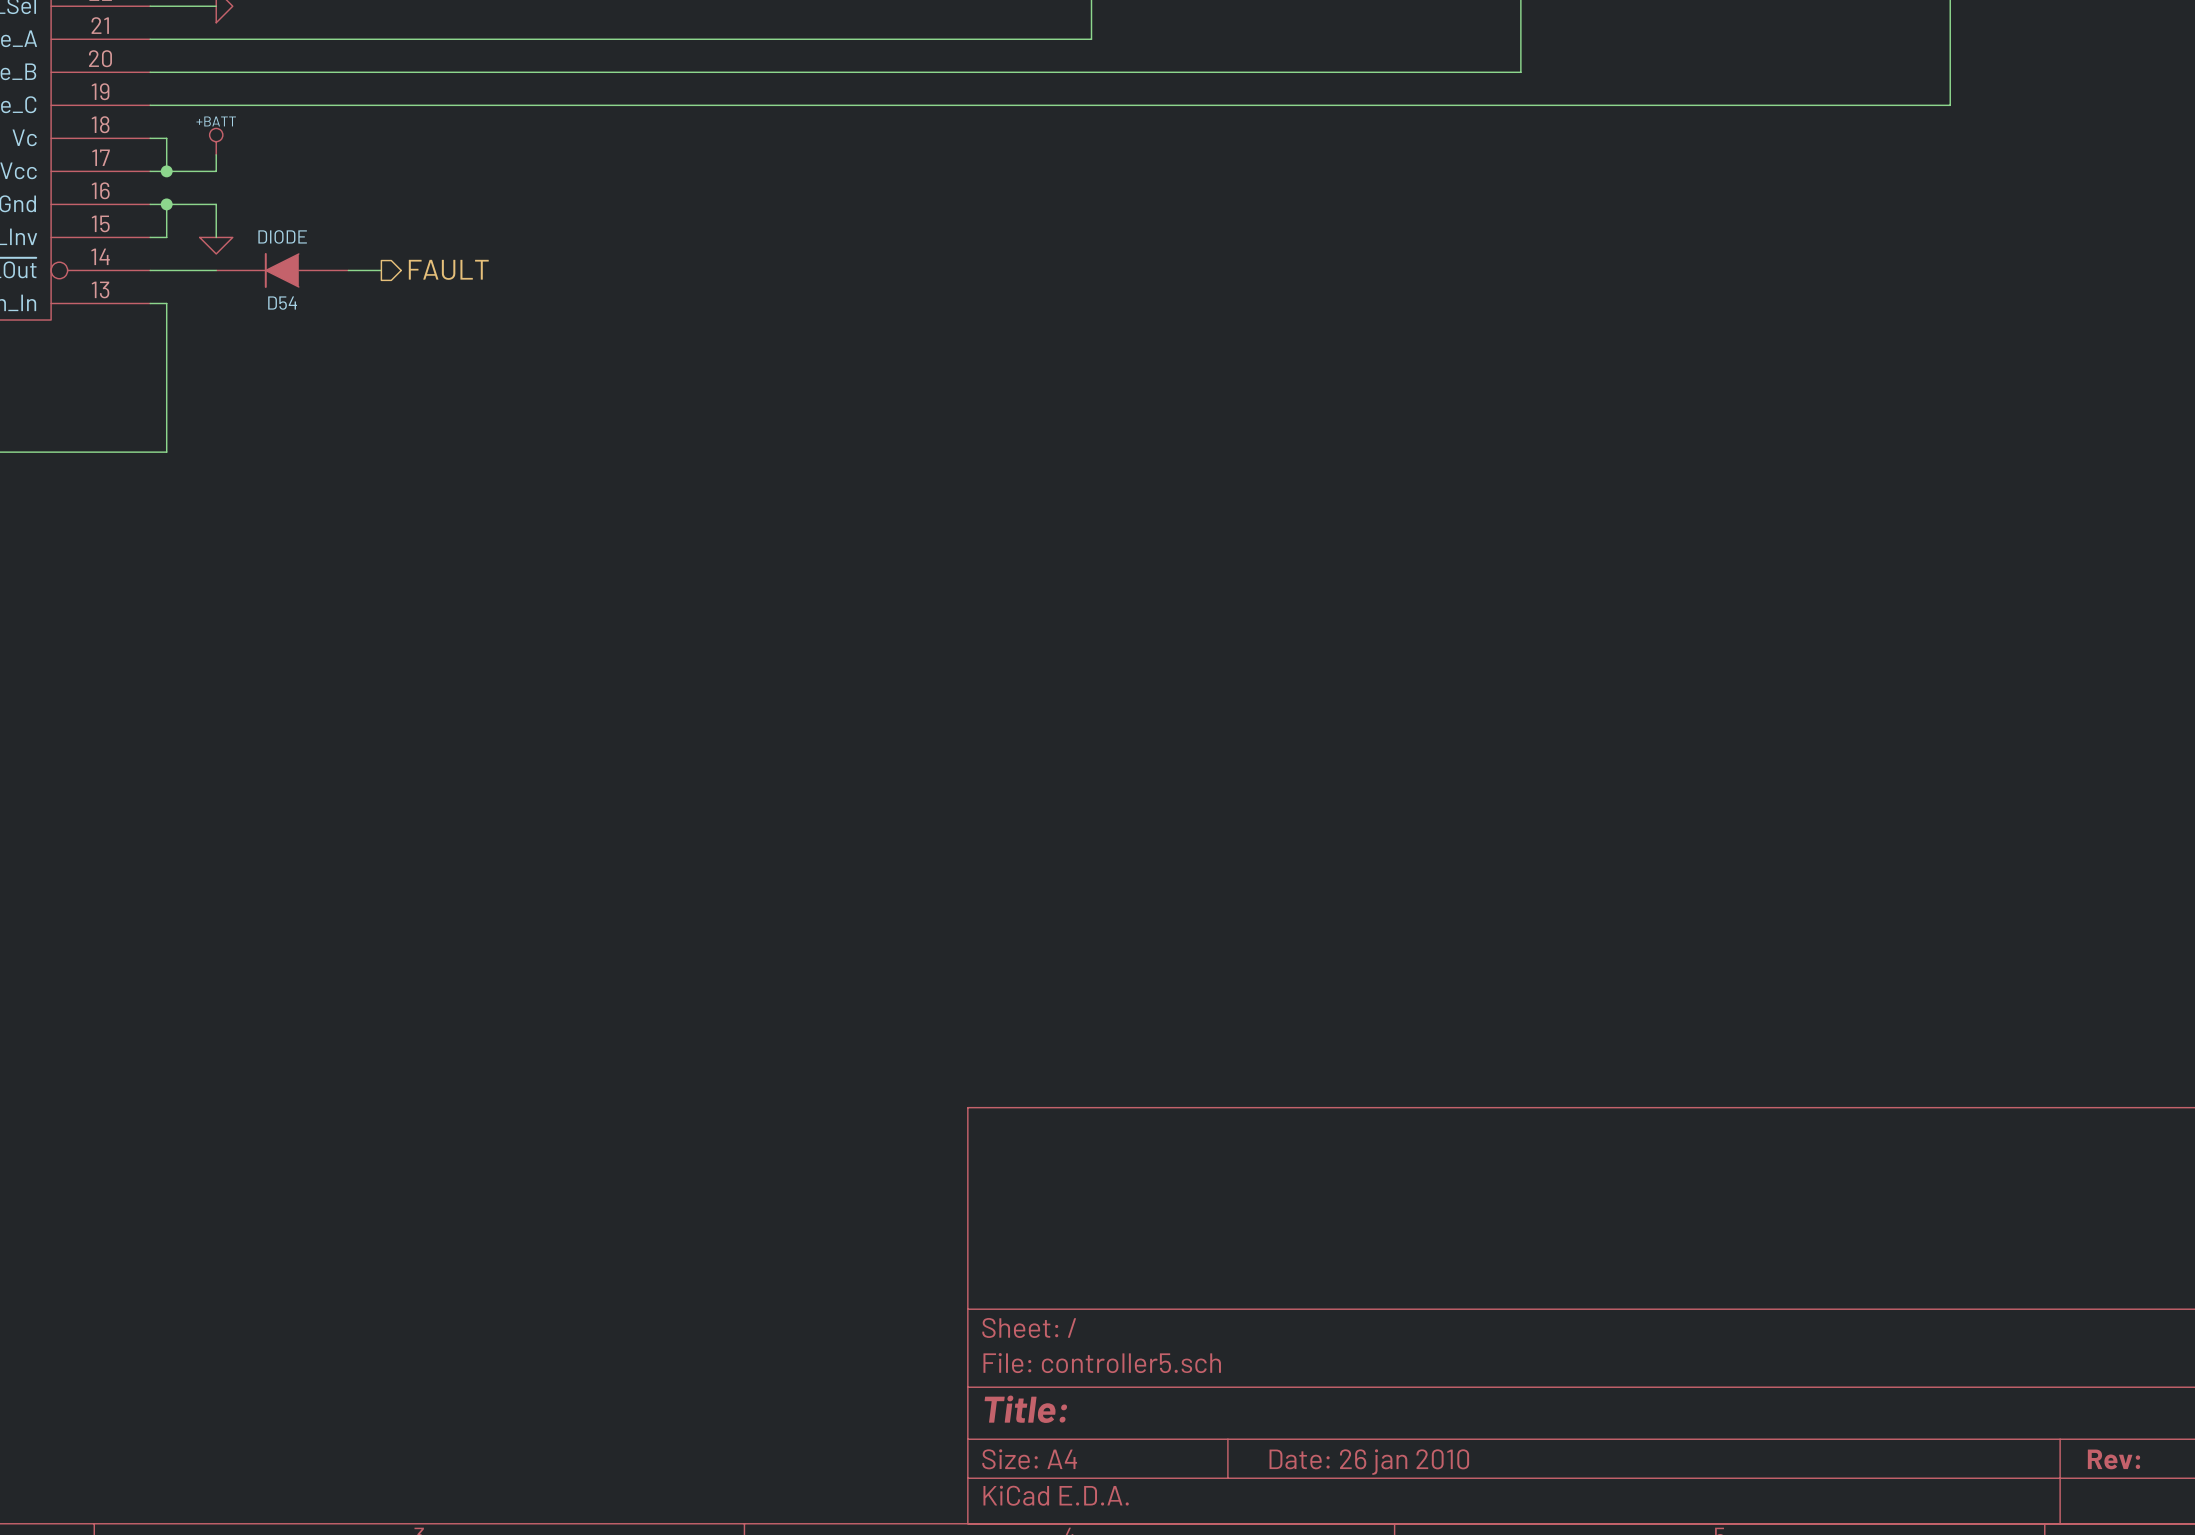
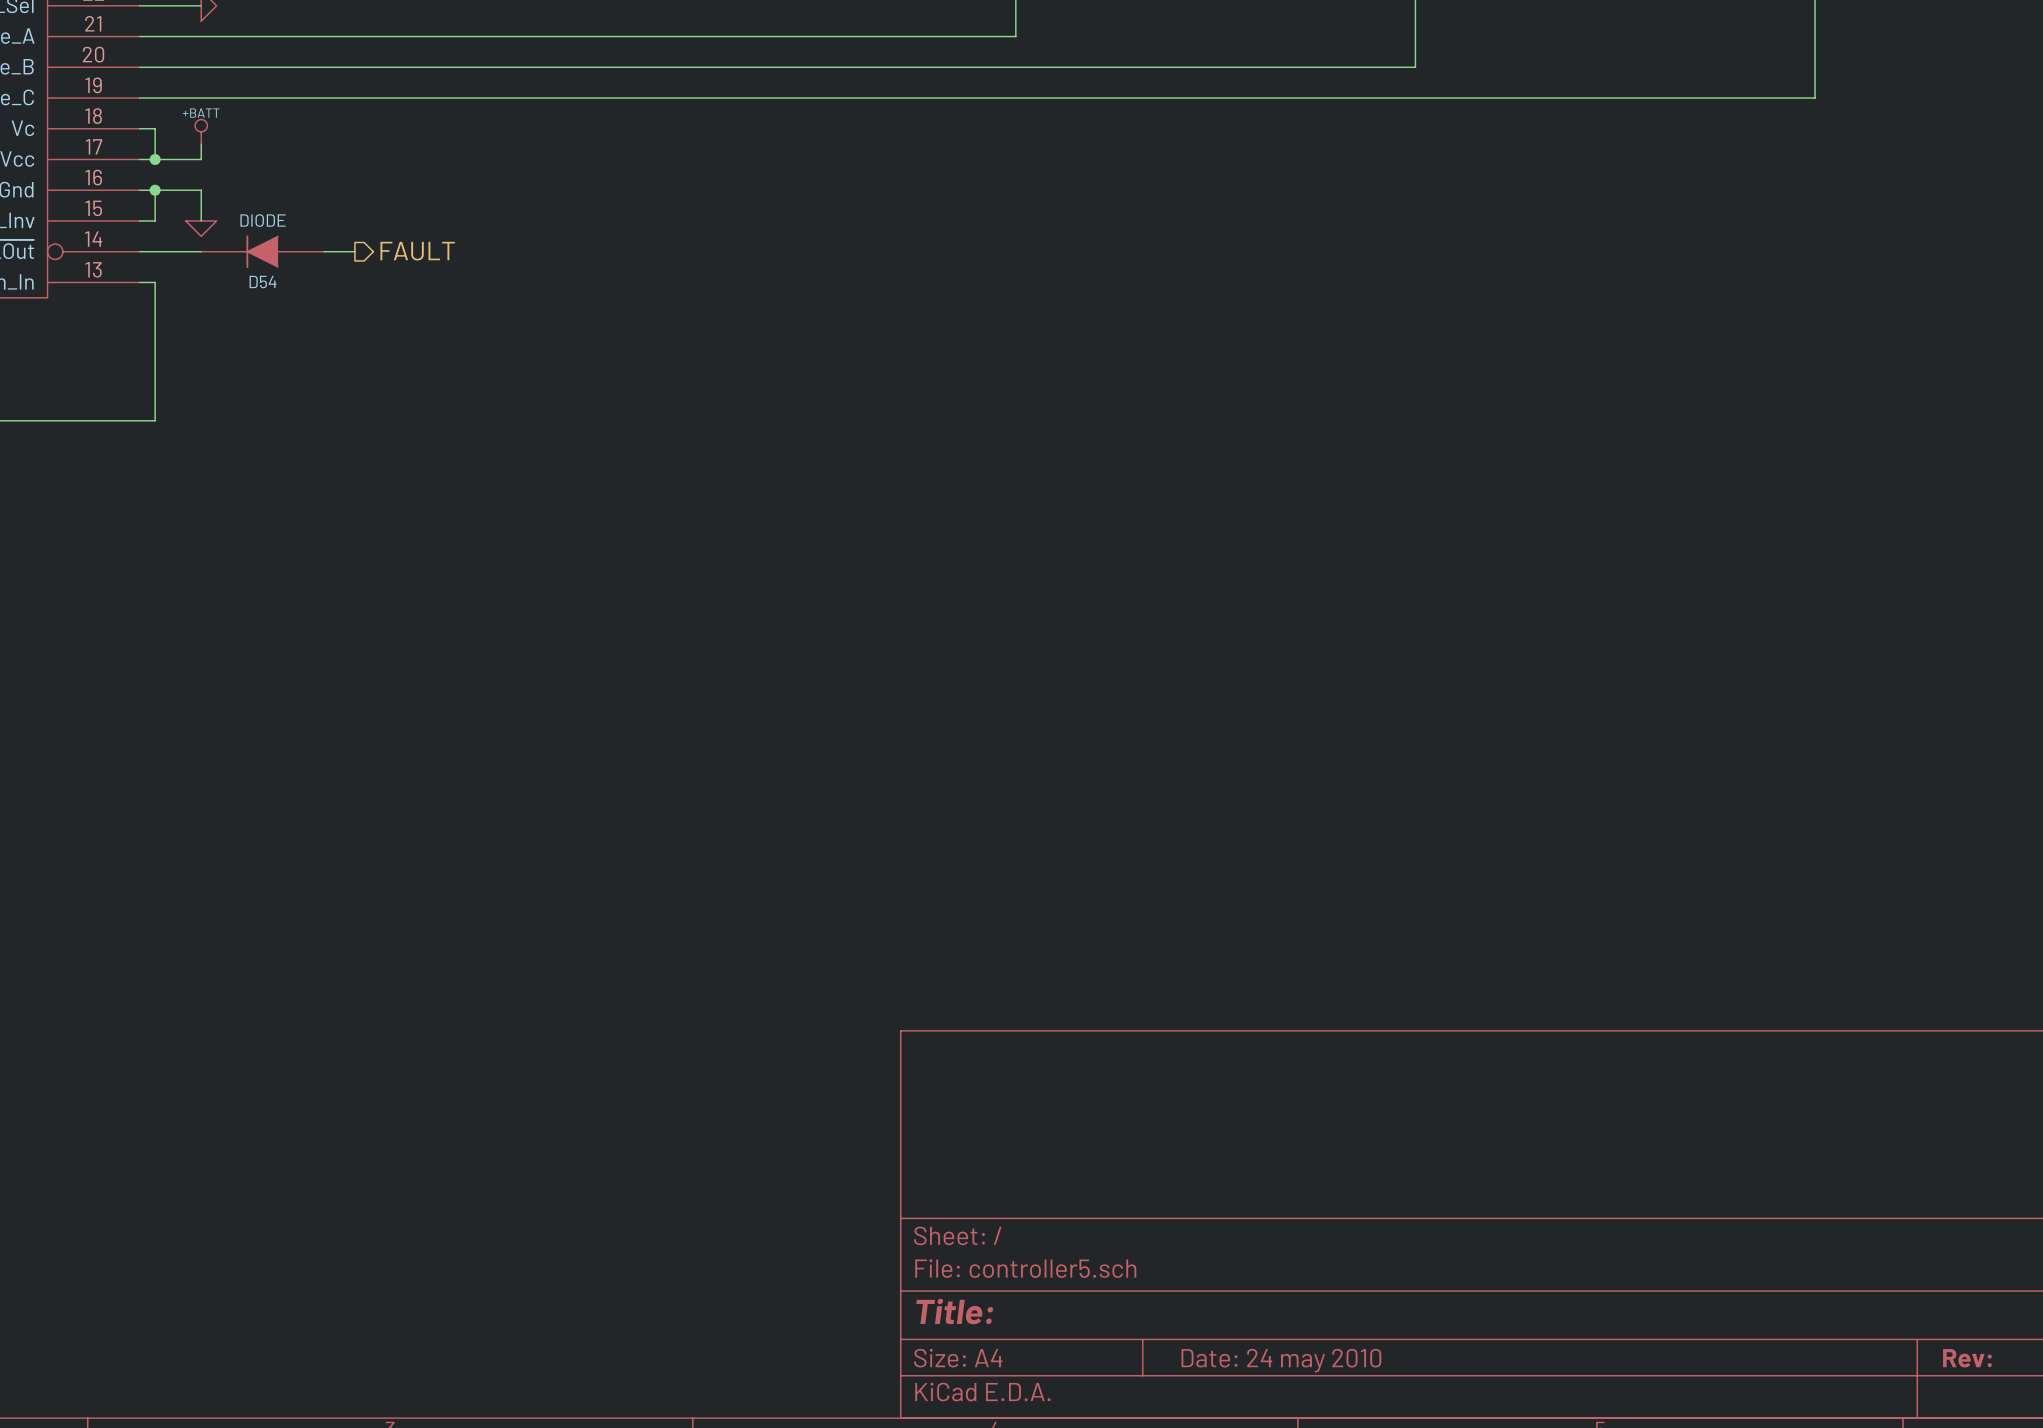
title block: Date: 26 jan 2010 (1369, 1462) -> Date: 24 may 2010 (1281, 1360)

